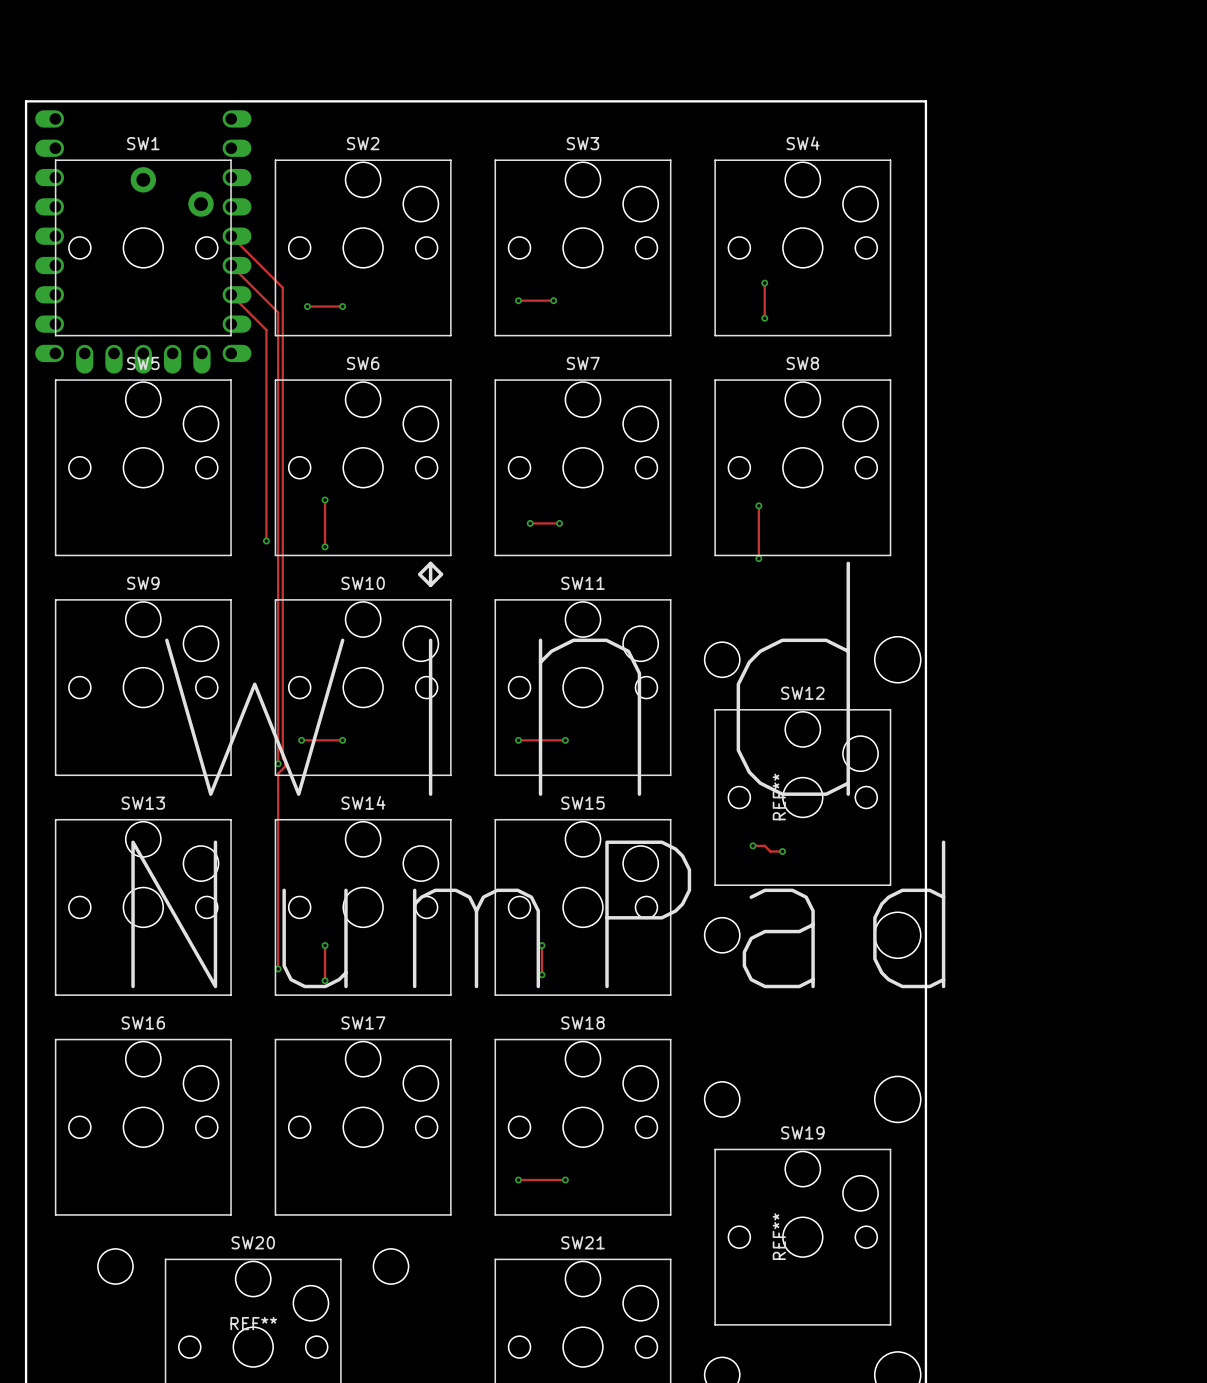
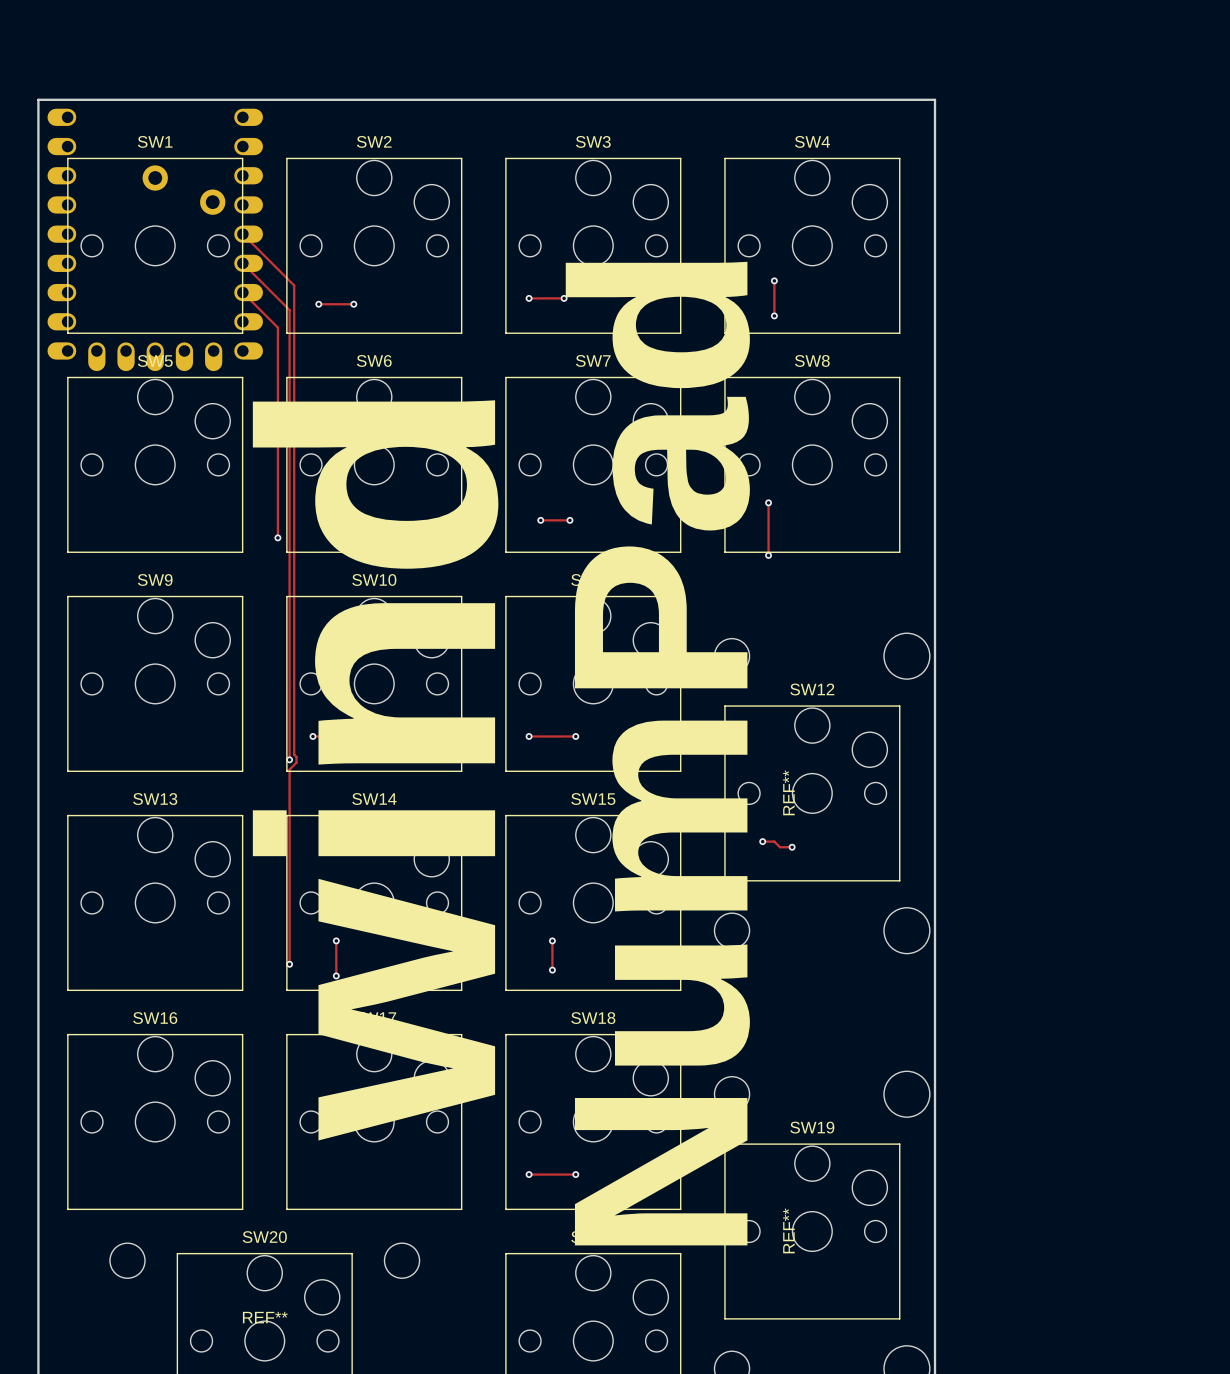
text: wind (507, 678) -> none
text: none -> NumPad (657, 753)
text: none -> wind (375, 770)
text: NumPad (538, 914) -> none

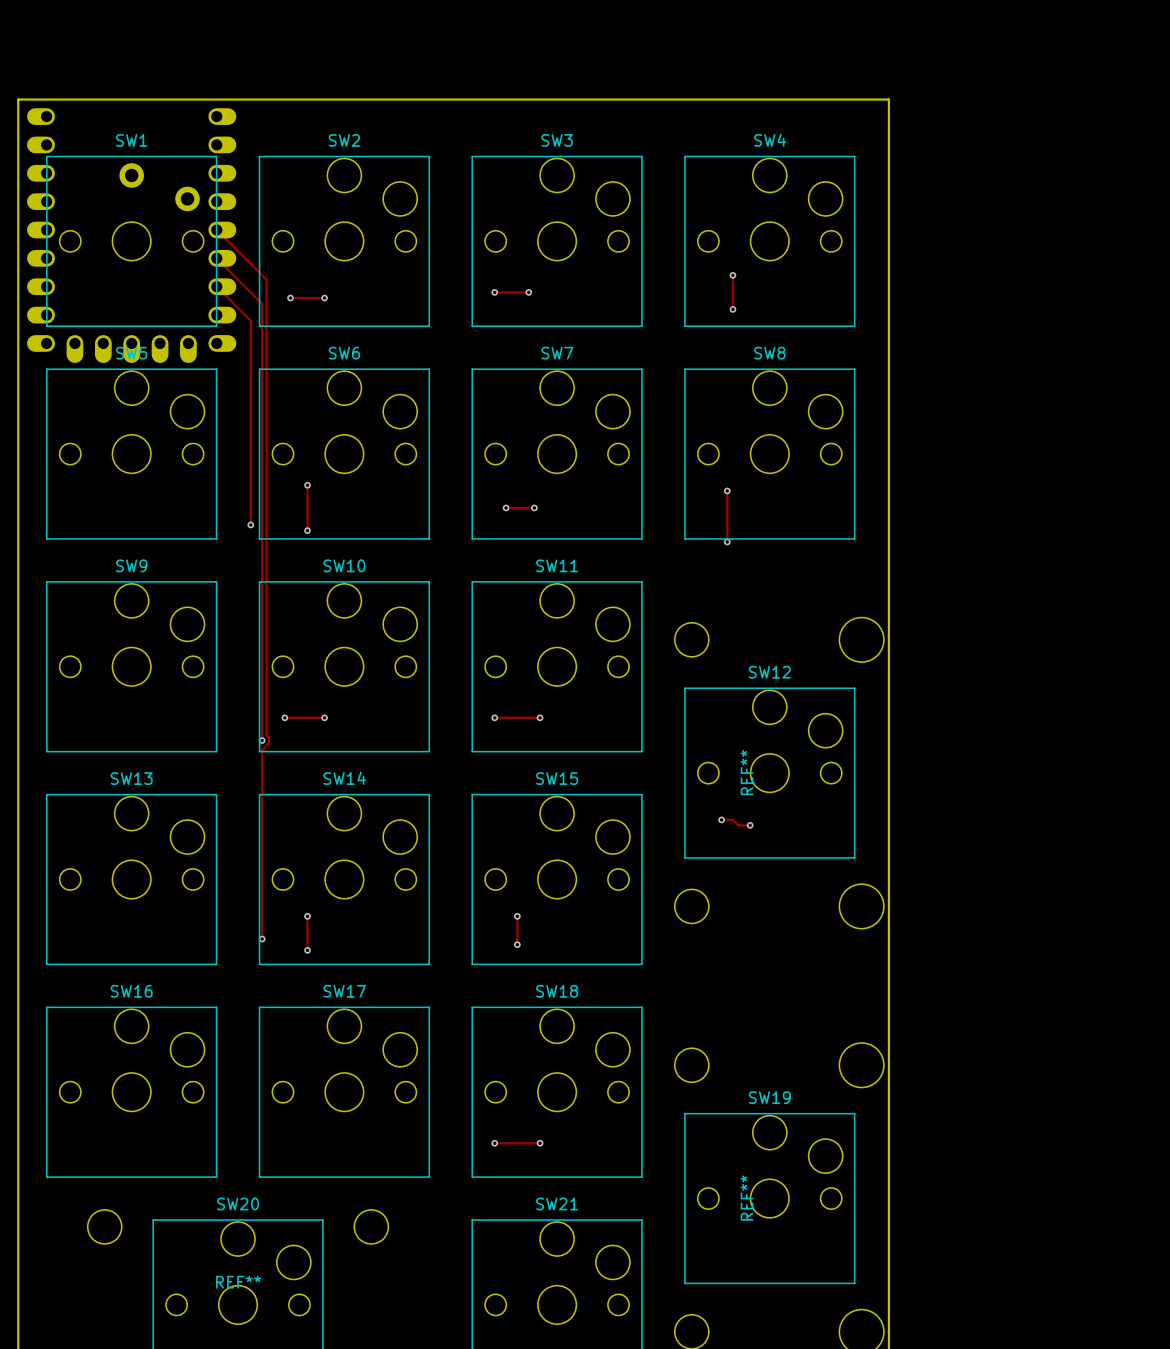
text: NumPad (657, 753) -> none
text: wind (375, 770) -> none

